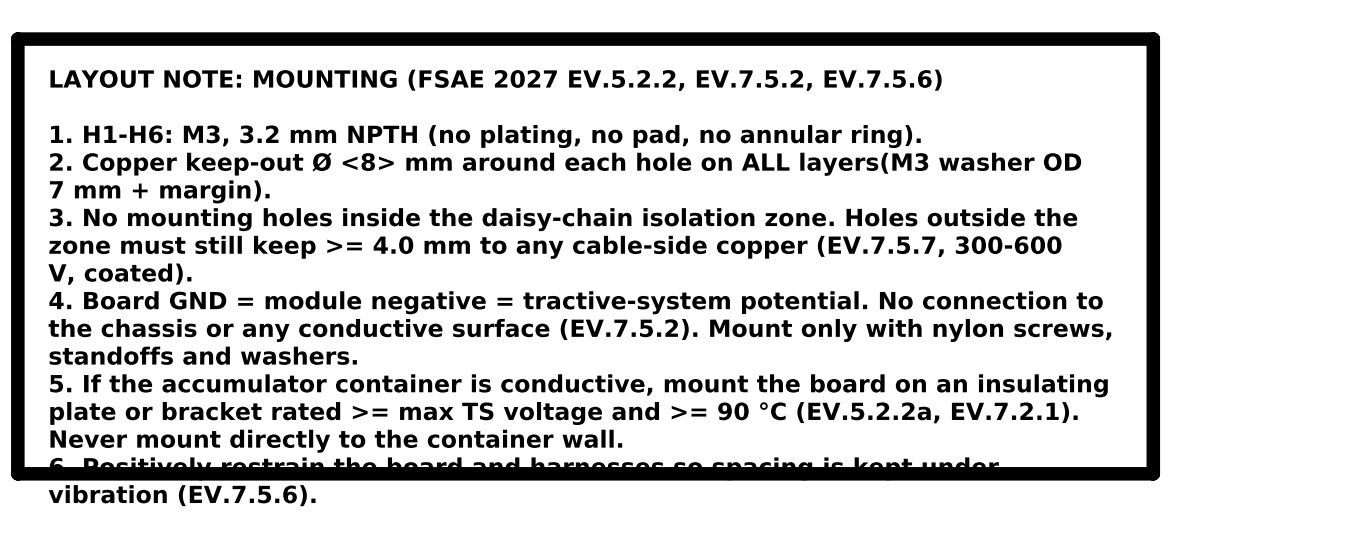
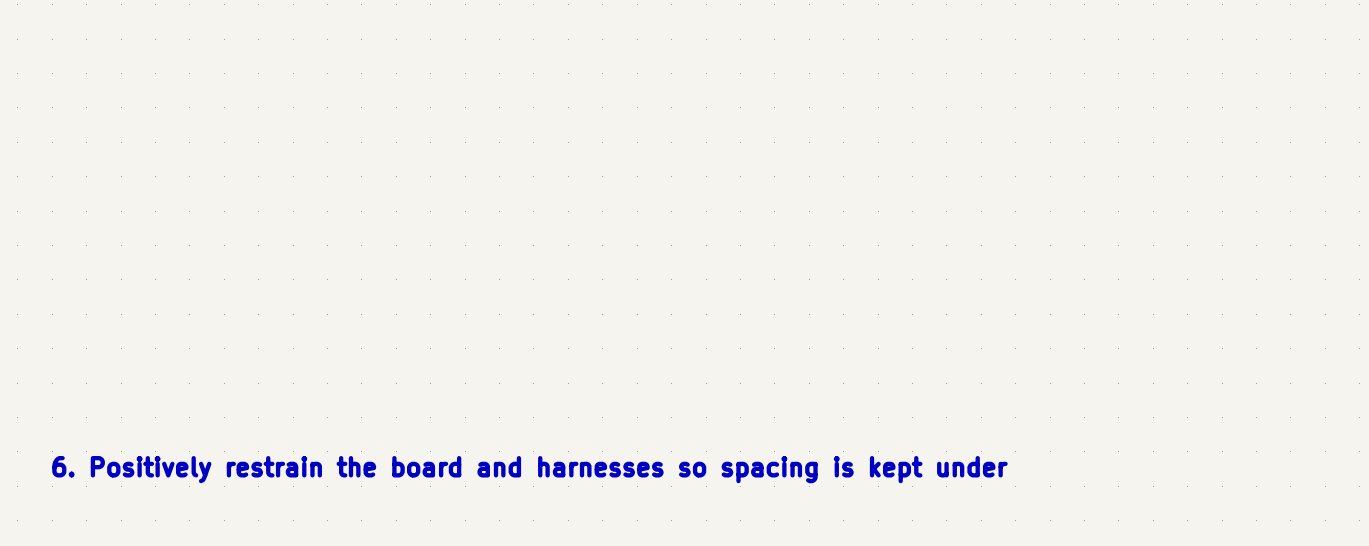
line: (17, 39) (1153, 39) (1153, 473) (17, 473) (17, 39) -> none
text: LAYOUT NOTE: MOUNTING (FSAE 2027 EV.5.2.2, EV.7.5.2, EV.7.5.6) (496, 80) -> none
text: 1. H1-H6: M3, 3.2 mm NPTH (no plating, no pad, no annular ring). (485, 136) -> none
text: 2. Copper keep-out Ø <8> mm around each hole on ALL layers(M3 washer OD (565, 164) -> none
text: 7 mm + margin). (159, 191) -> none
text: 3. No mounting holes inside the daisy-chain isolation zone. Holes outside the (563, 219) -> none
text: zone must still keep >= 4.0 mm to any cable-side copper (EV.7.5.7, 300-600 (555, 247) -> none
text: V, coated). (119, 274) -> none
text: 4. Board GND = module negative = tractive-system potential. No connection to (576, 302) -> none
text: the chassis or any conductive surface (EV.7.5.2). Mount only with nylon screws, (579, 330) -> none
text: standoffs and washers. (203, 355) -> none
text: 5. If the accumulator container is conductive, mount the board on an insulating (578, 385) -> none
text: plate or bracket rated >= max TS voltage and >= 90 °C (EV.5.2.2a, EV.7.2.1). (563, 413) -> none
text: Never mount directly to the container wall. (336, 441) -> none
text: vibration (EV.7.5.6). (182, 495) -> none

